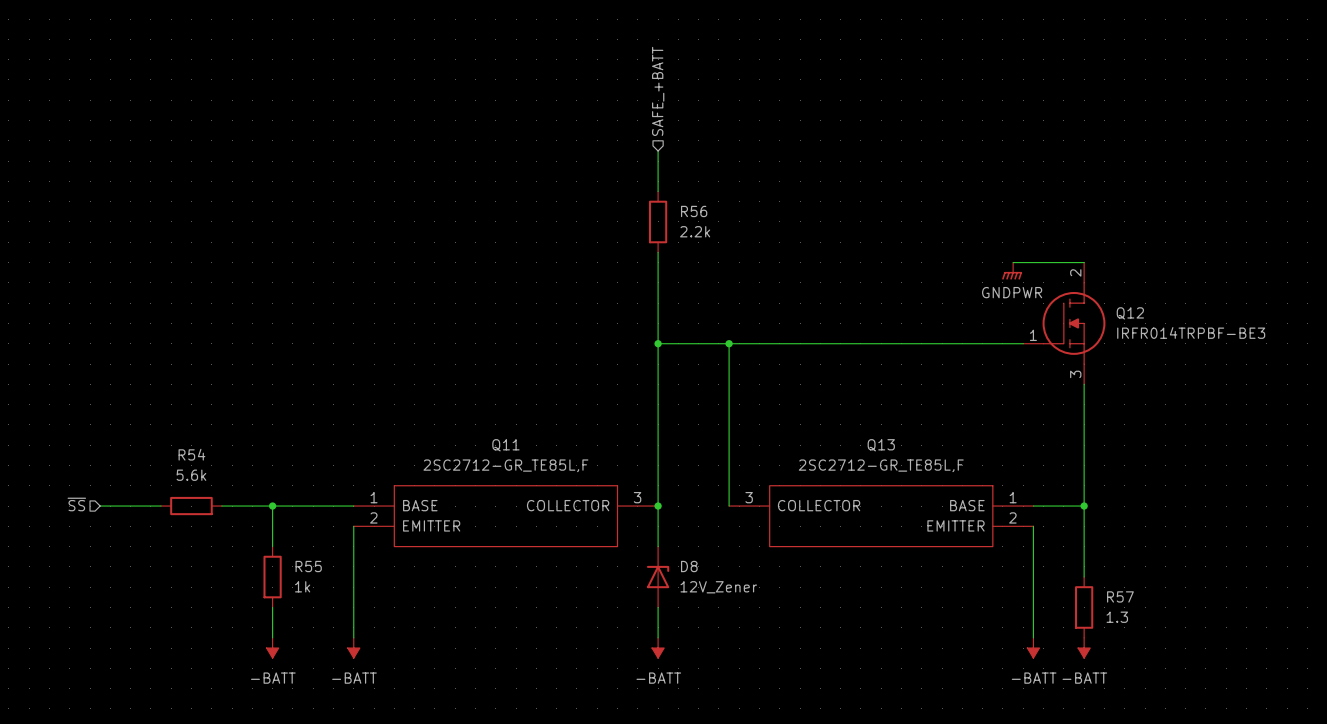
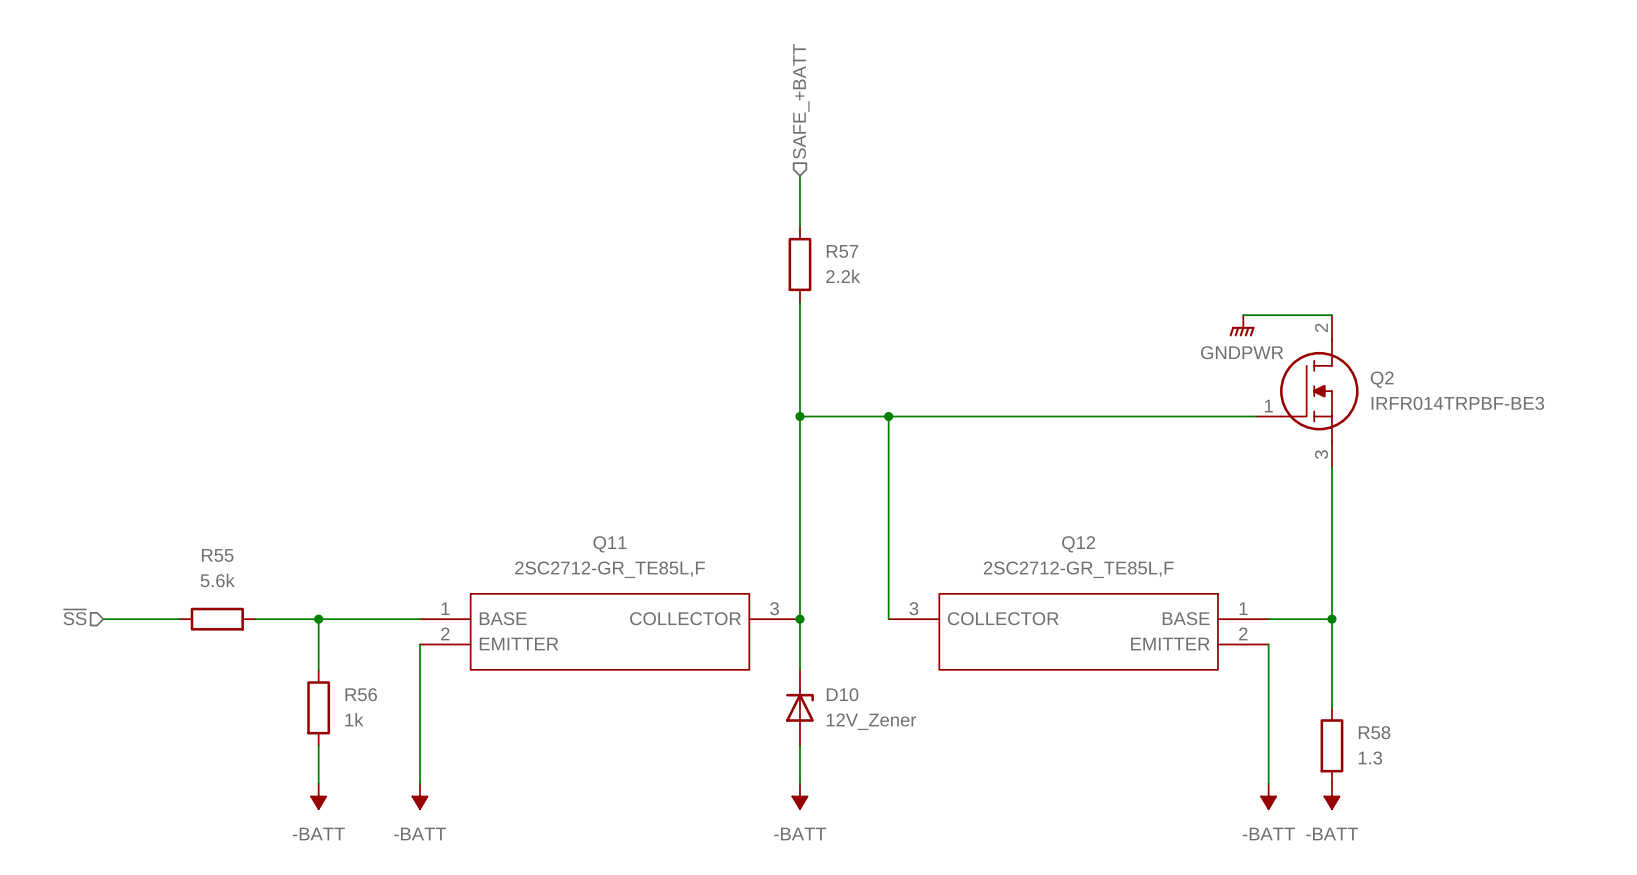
R56 name: R56 (694, 211) -> R57 (842, 251)
Q12 name: Q12 (1130, 313) -> Q2 (1382, 379)
Q13 name: Q13 (881, 445) -> Q12 (1078, 544)
R54 name: R54 (191, 454) -> R55 (217, 555)
R55 name: R55 (308, 566) -> R56 (361, 694)
D8 name: D8 (689, 566) -> D10 (842, 694)
R57 name: R57 (1120, 596) -> R58 (1374, 732)

